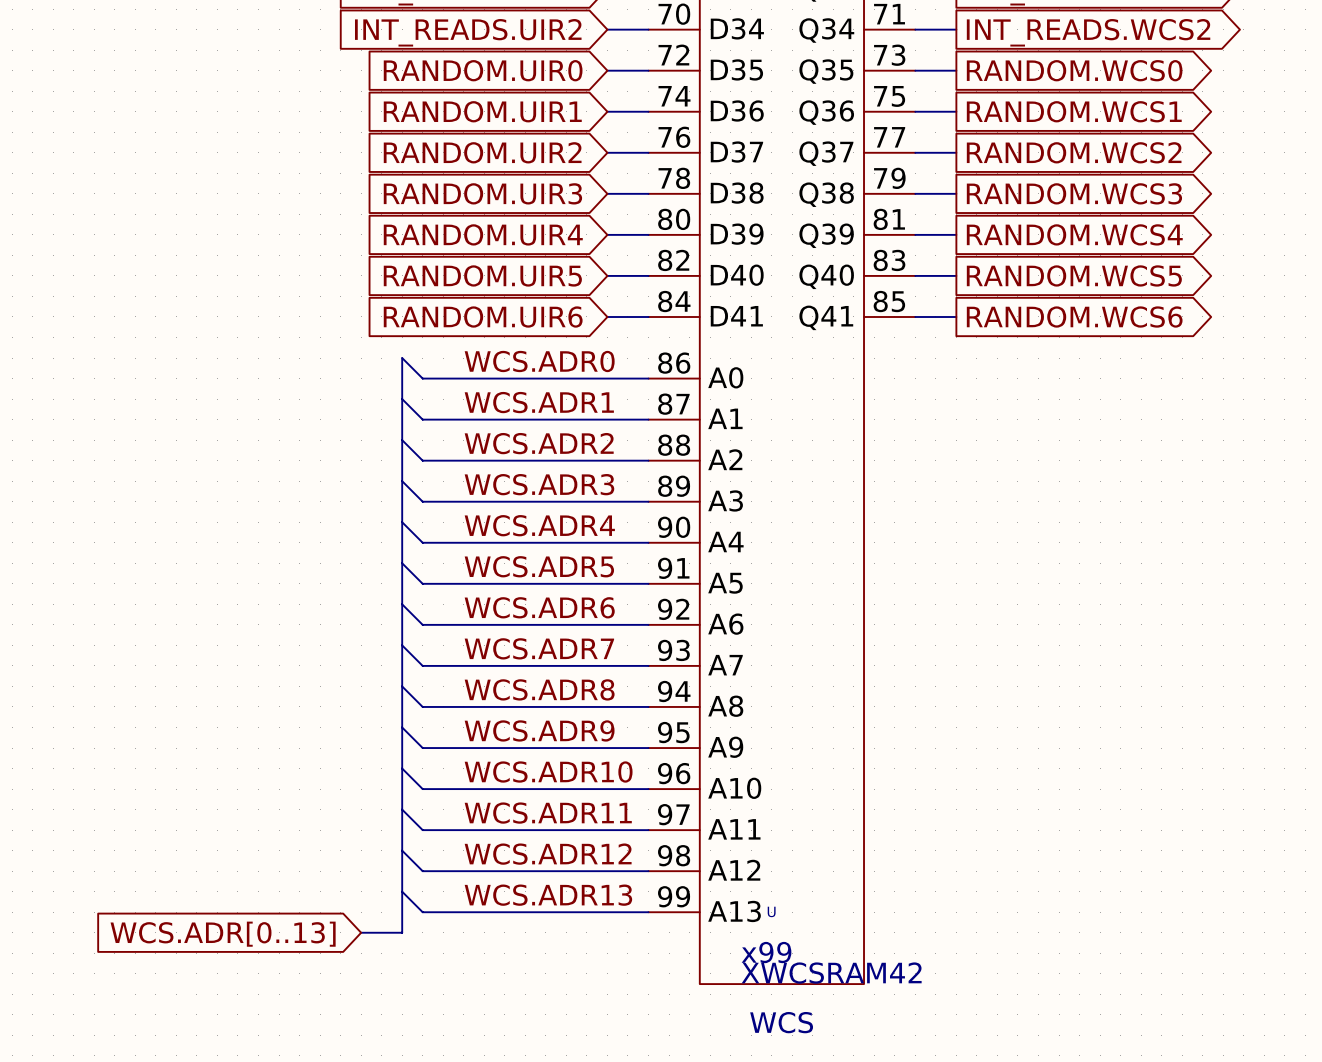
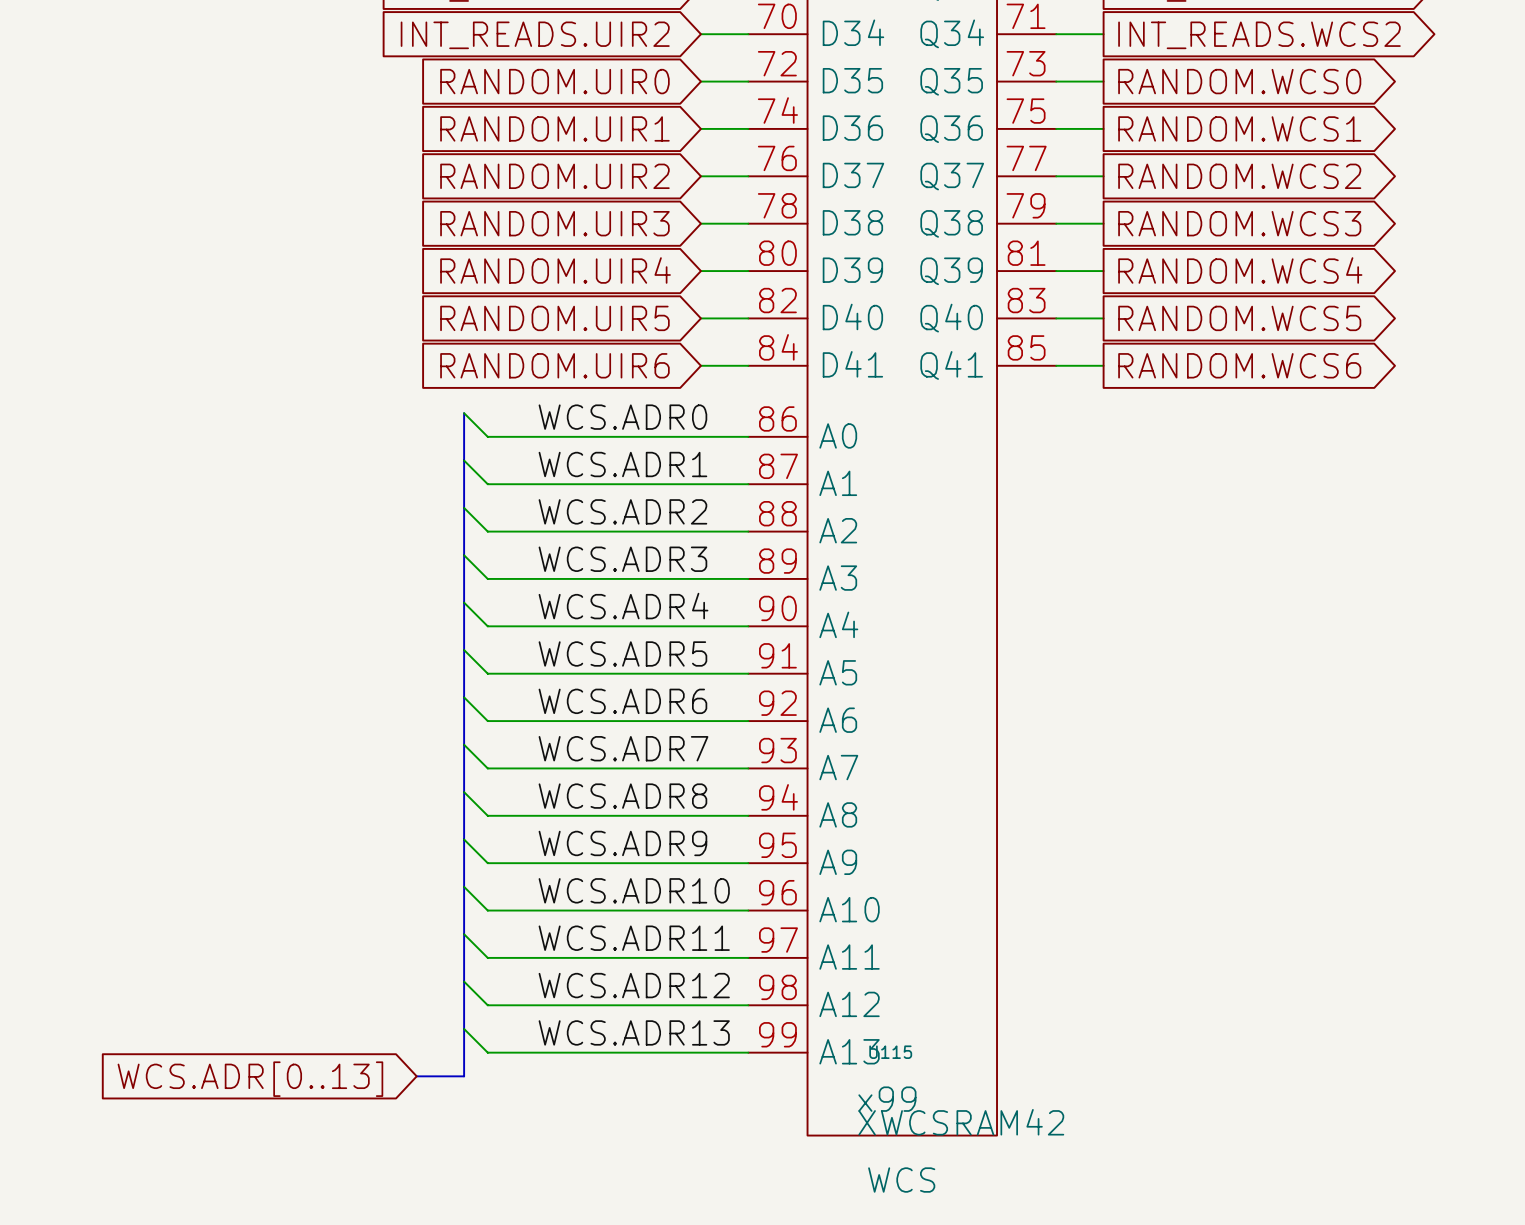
U name: U (771, 911) -> U115 (890, 1052)

